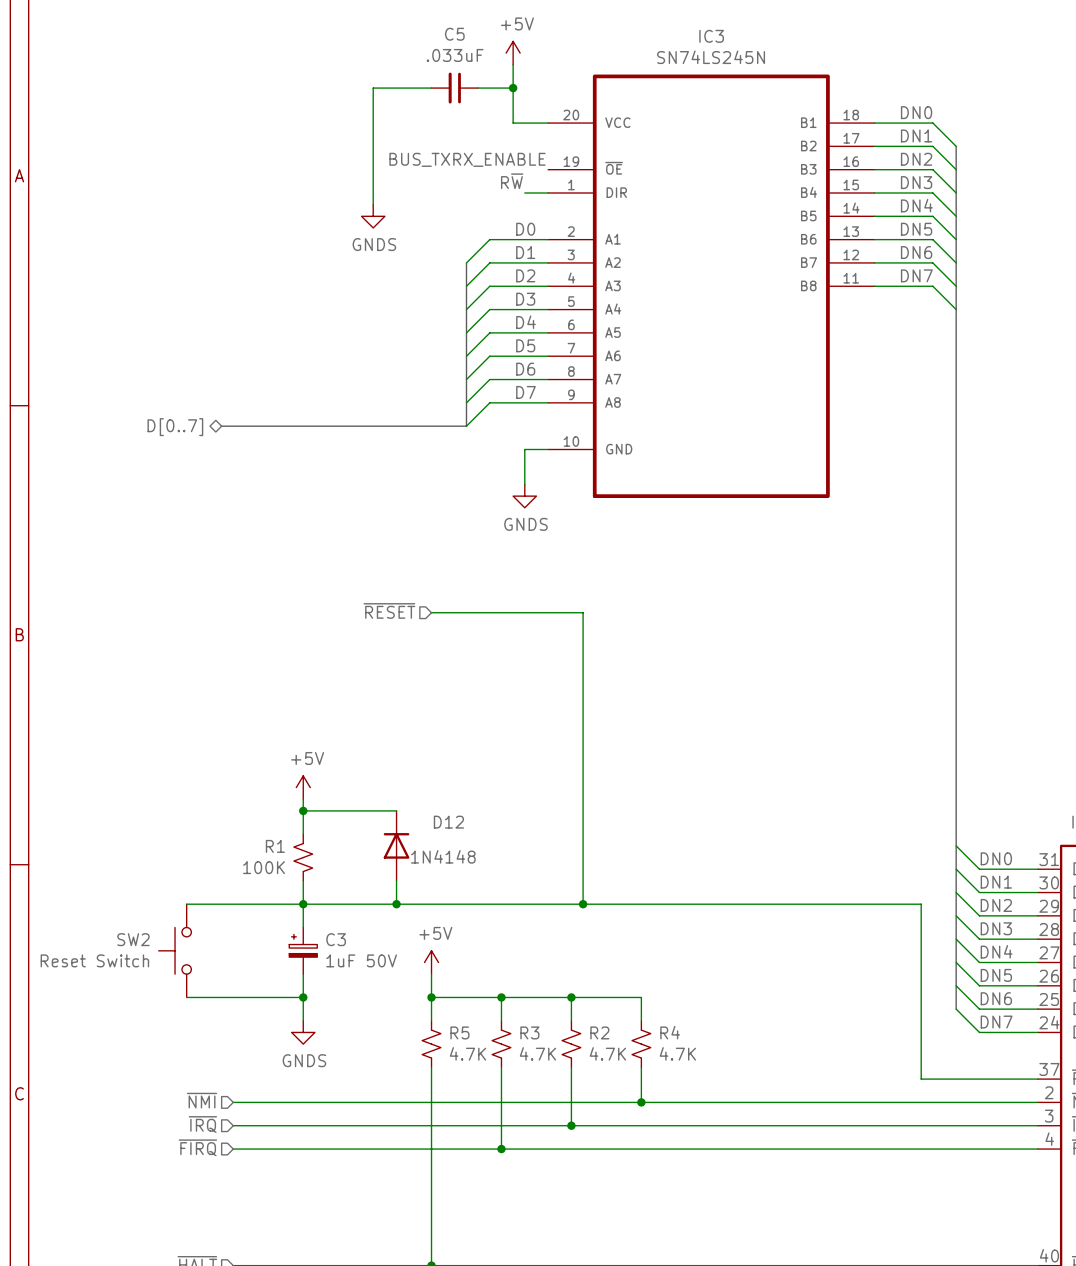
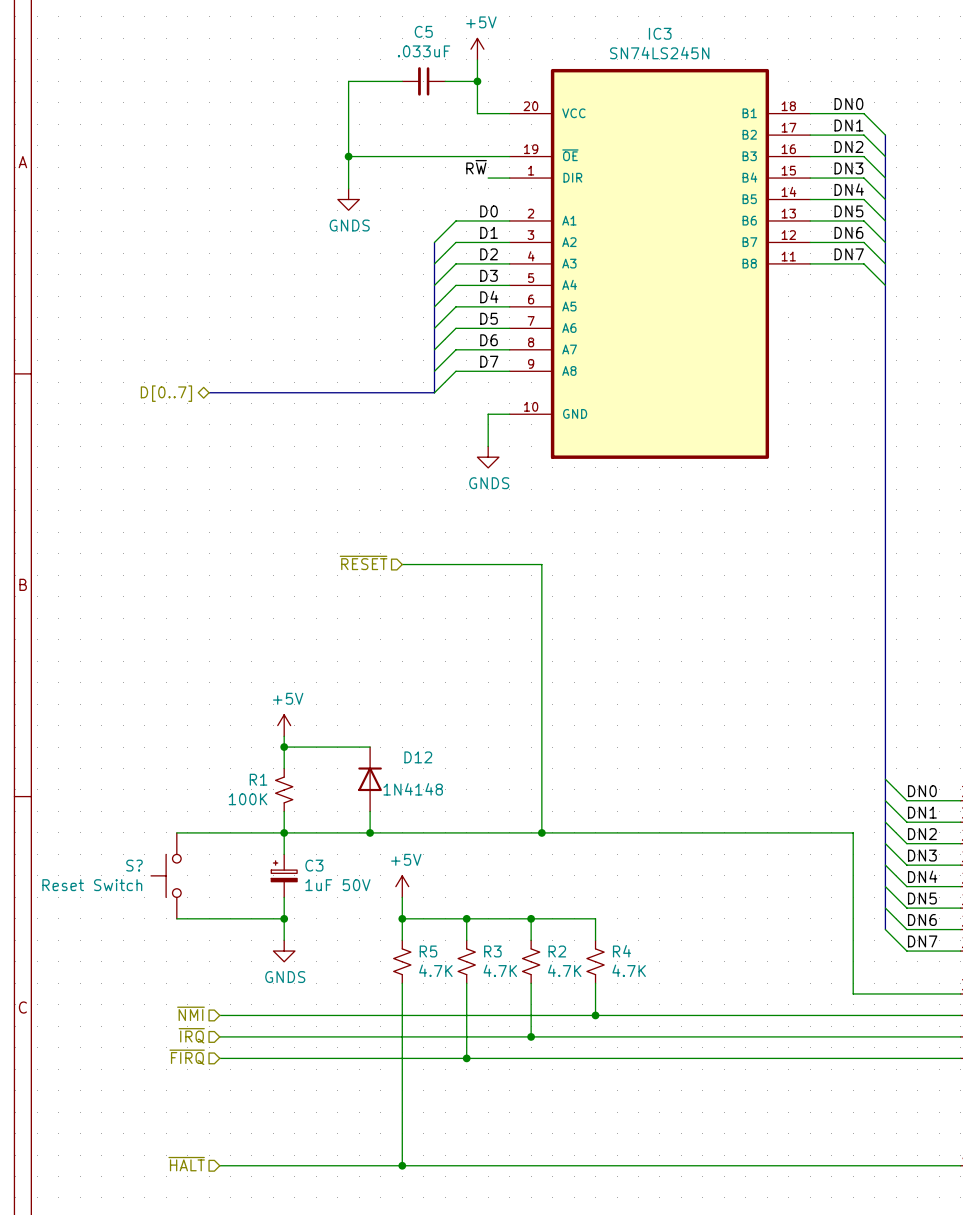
label: BUS_TXRX_ENABLE (467, 159) -> none
wire: none -> (348, 156) (509, 156)
junction: none -> (348, 156)
SW2 name: SW2 (133, 939) -> S? (134, 865)

